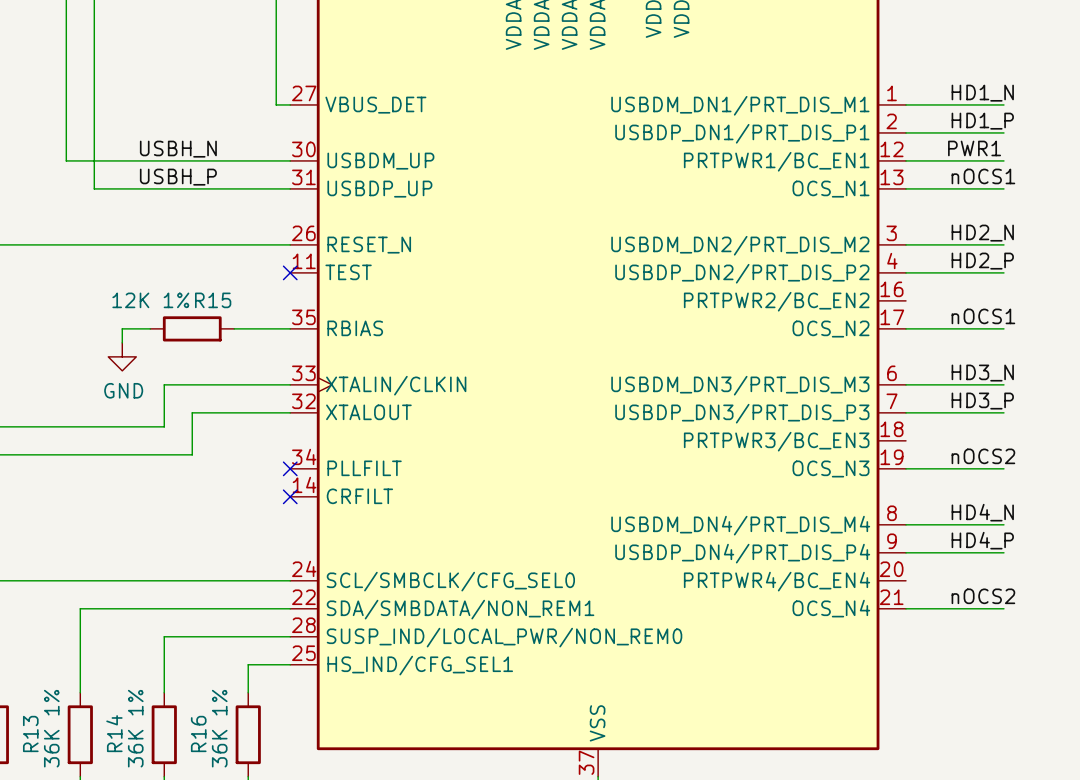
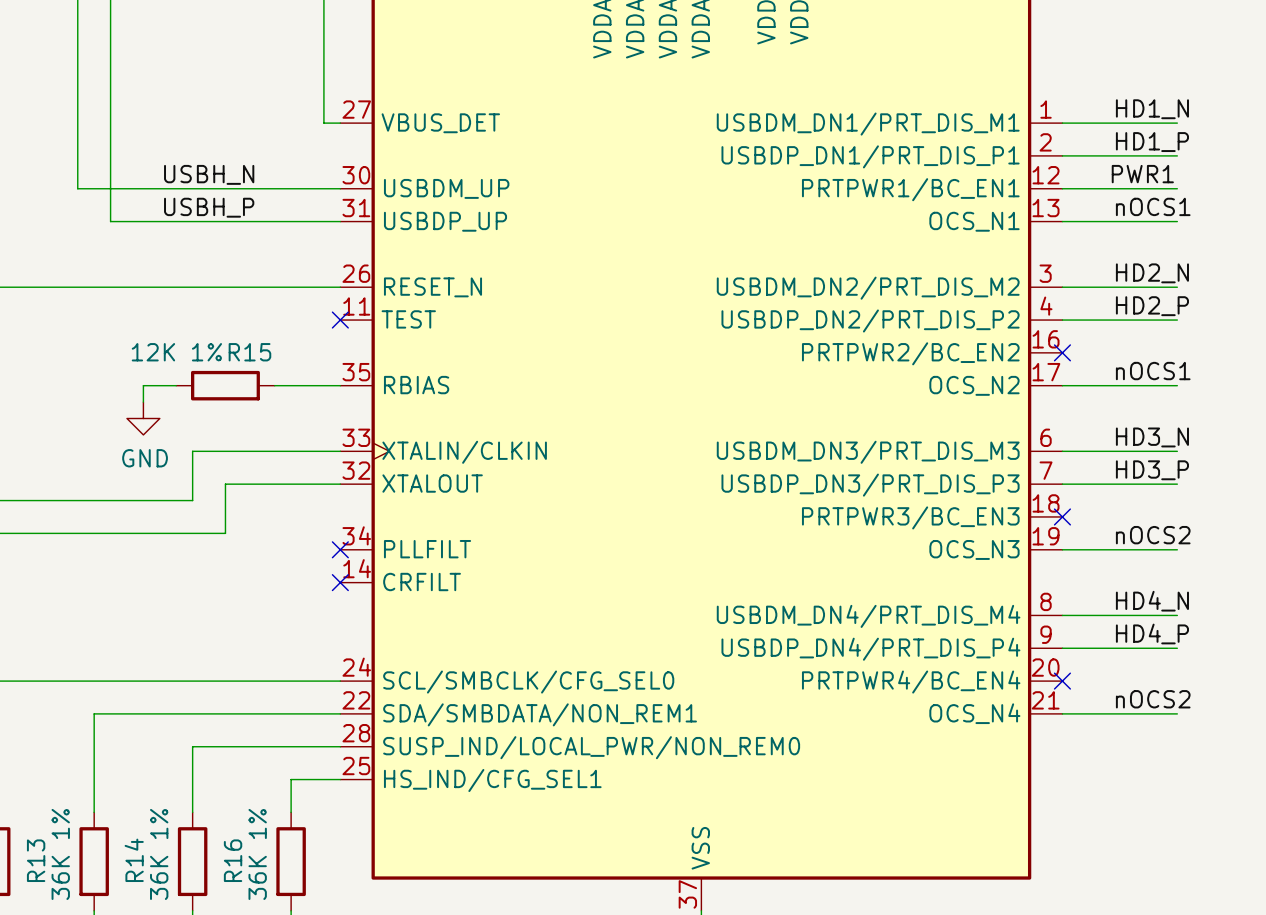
no-connect mark: none -> (1062, 352)
no-connect mark: none -> (1062, 516)
no-connect mark: none -> (1062, 681)

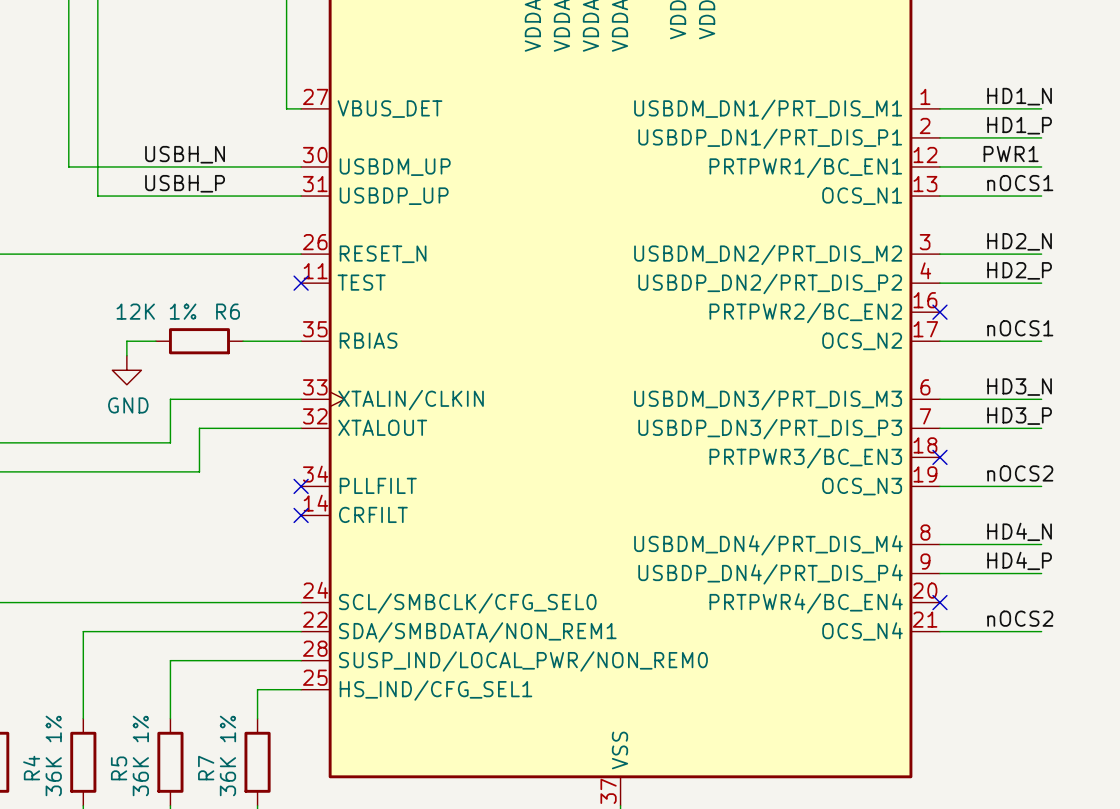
R15 name: R15 (249, 352) -> R6 (228, 311)
R13 name: R13 (36, 860) -> R4 (31, 768)
R14 name: R14 (134, 860) -> R5 (119, 768)
R16 name: R16 (233, 860) -> R7 (206, 768)

